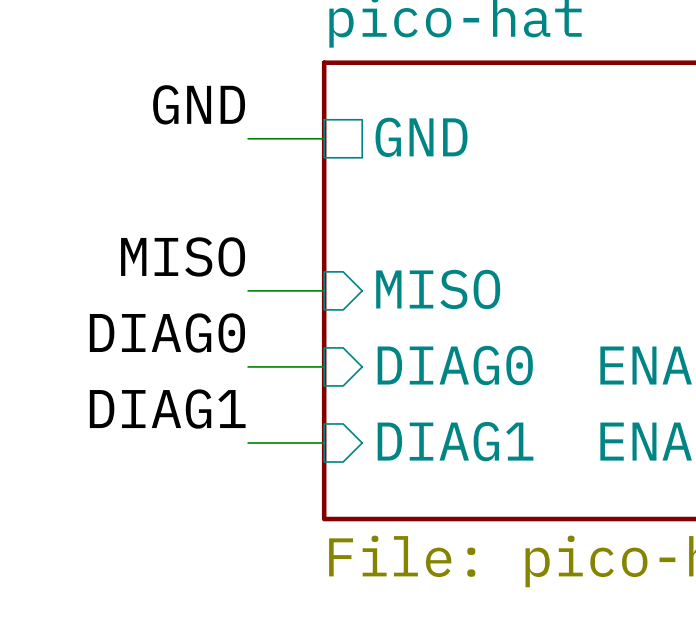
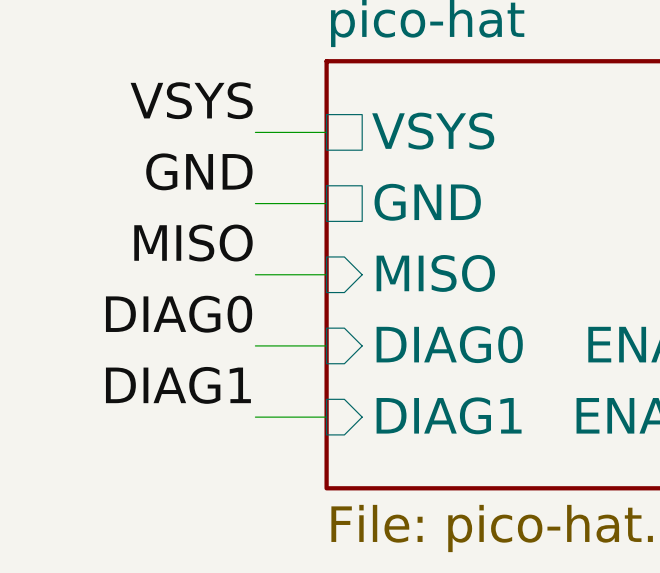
label: GND (199, 104) -> VSYS (191, 100)
sheet pin: GND (421, 137) -> VSYS (433, 131)
label: none -> GND (199, 171)
sheet pin: none -> GND (427, 202)
wire: none -> (255, 203) (326, 203)

